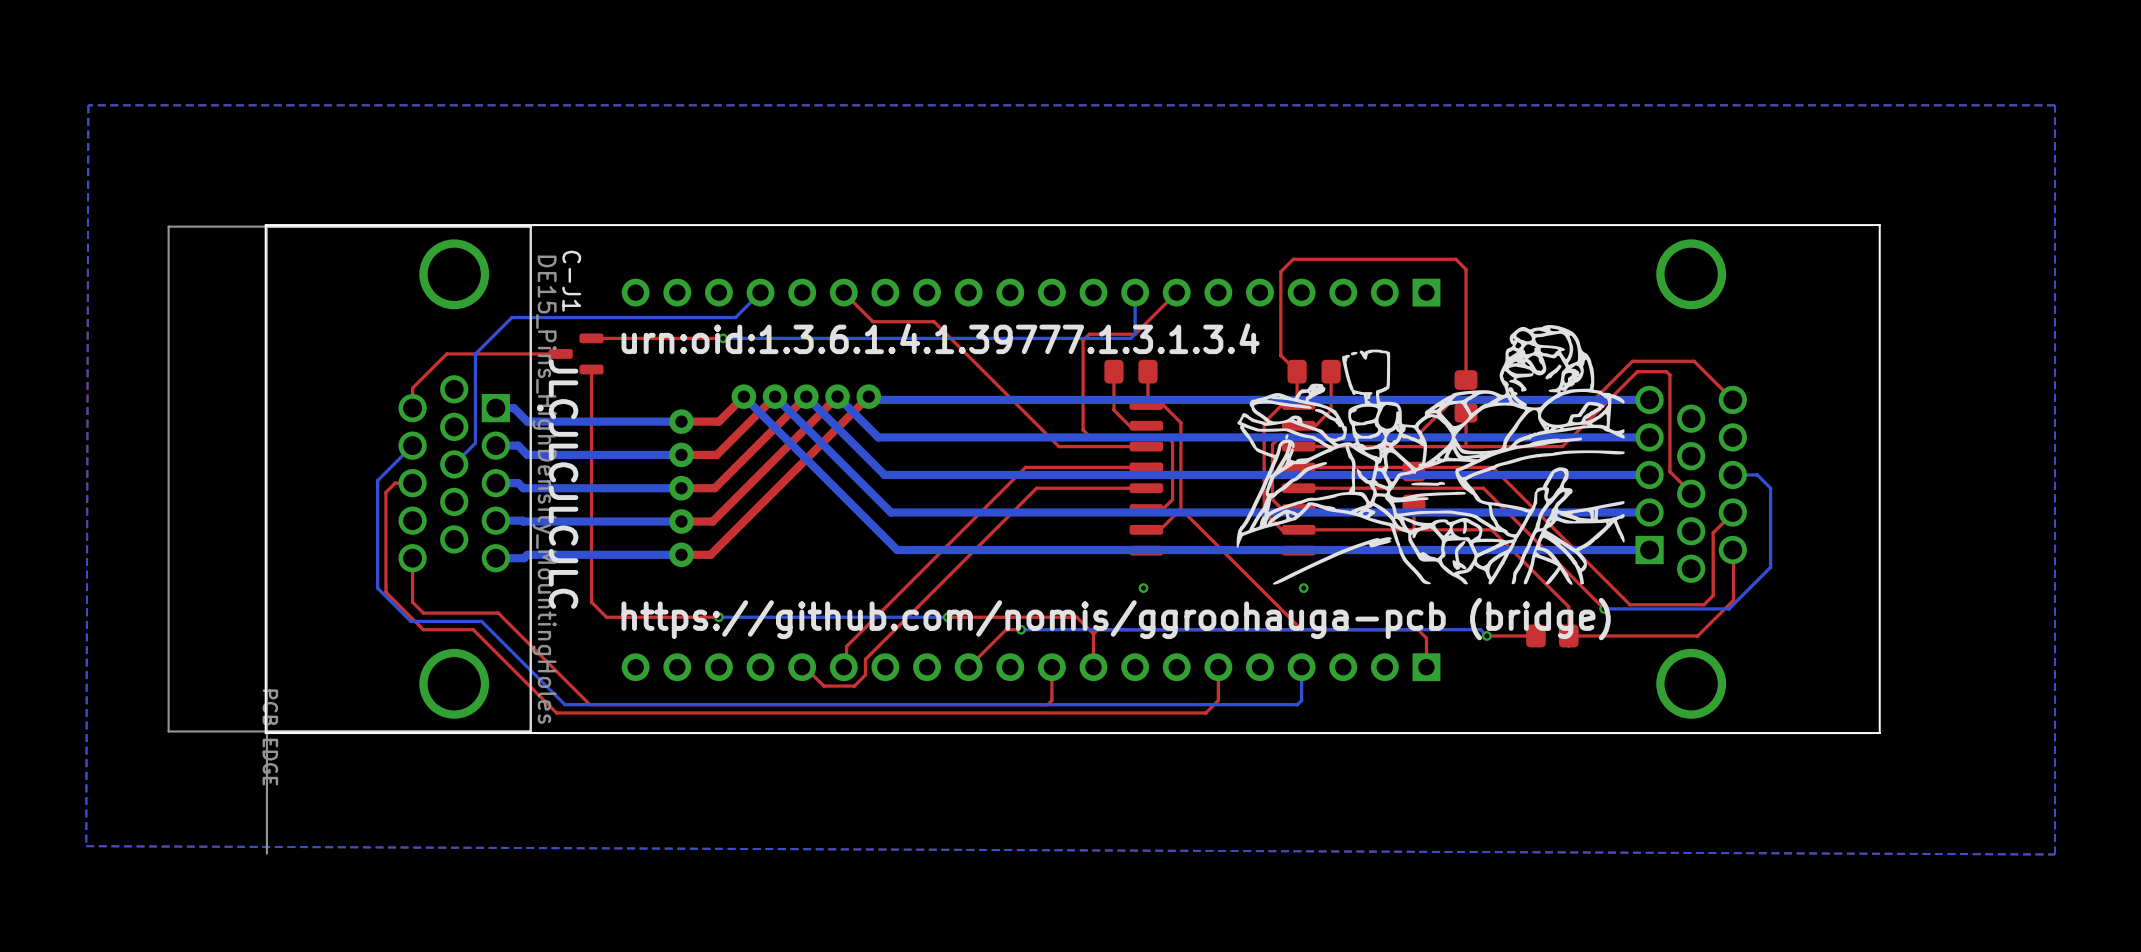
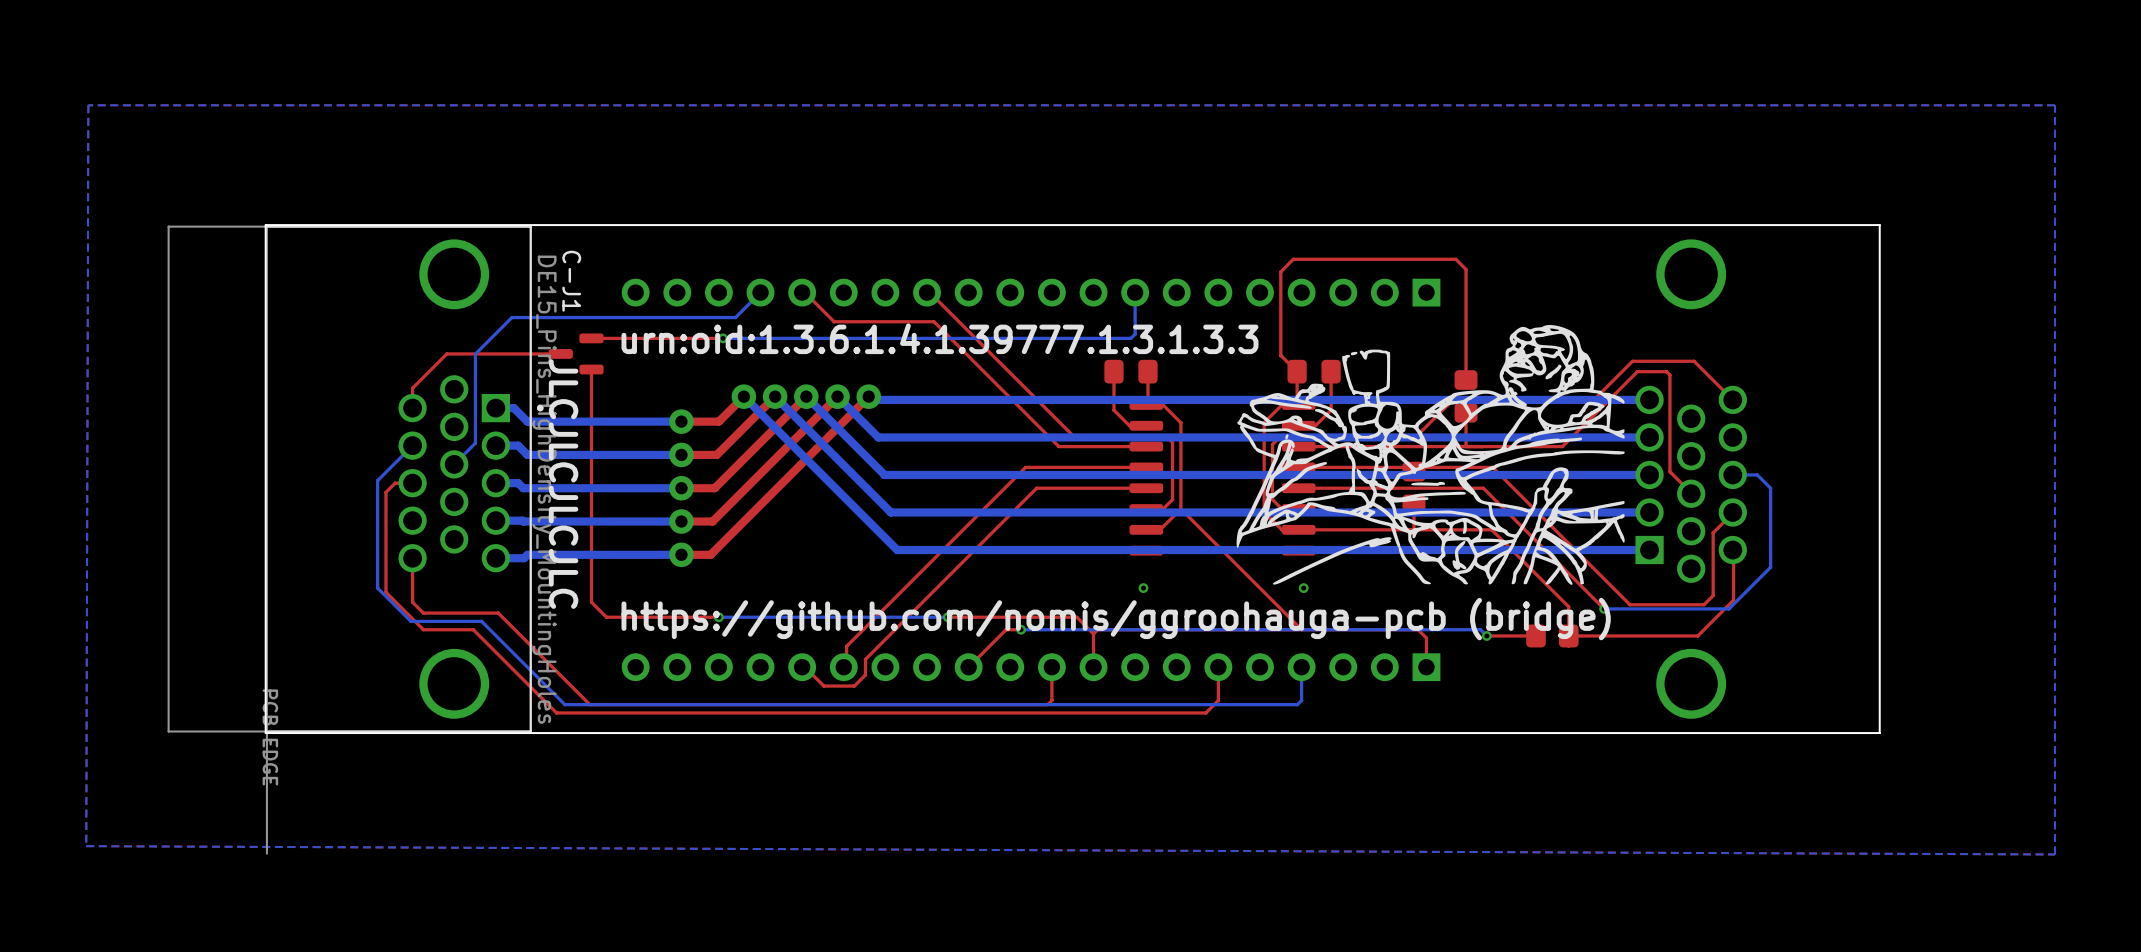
top track: (843, 292) (872, 321) -> (805, 292) (834, 321) (872, 321)
top track: (1176, 292) (1135, 334) (1089, 334) (1083, 340) (1083, 429) (1089, 436) (1166, 436) -> (929, 292) (1072, 435) (1166, 436)
text: urn:oid:1.3.6.1.4.1.39777.1.3.1.3.4 (940, 338) -> urn:oid:1.3.6.1.4.1.39777.1.3.1.3.3 (939, 338)

